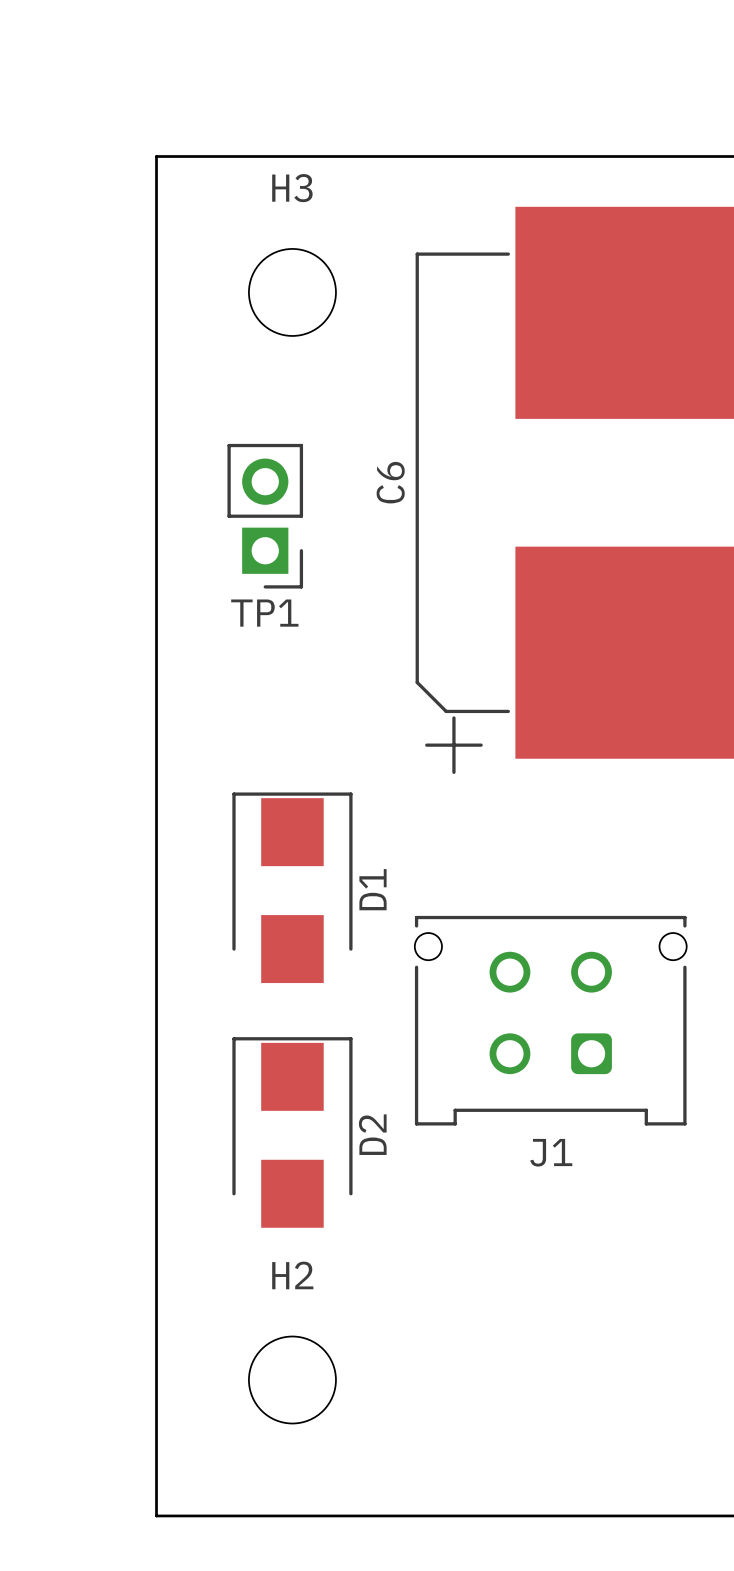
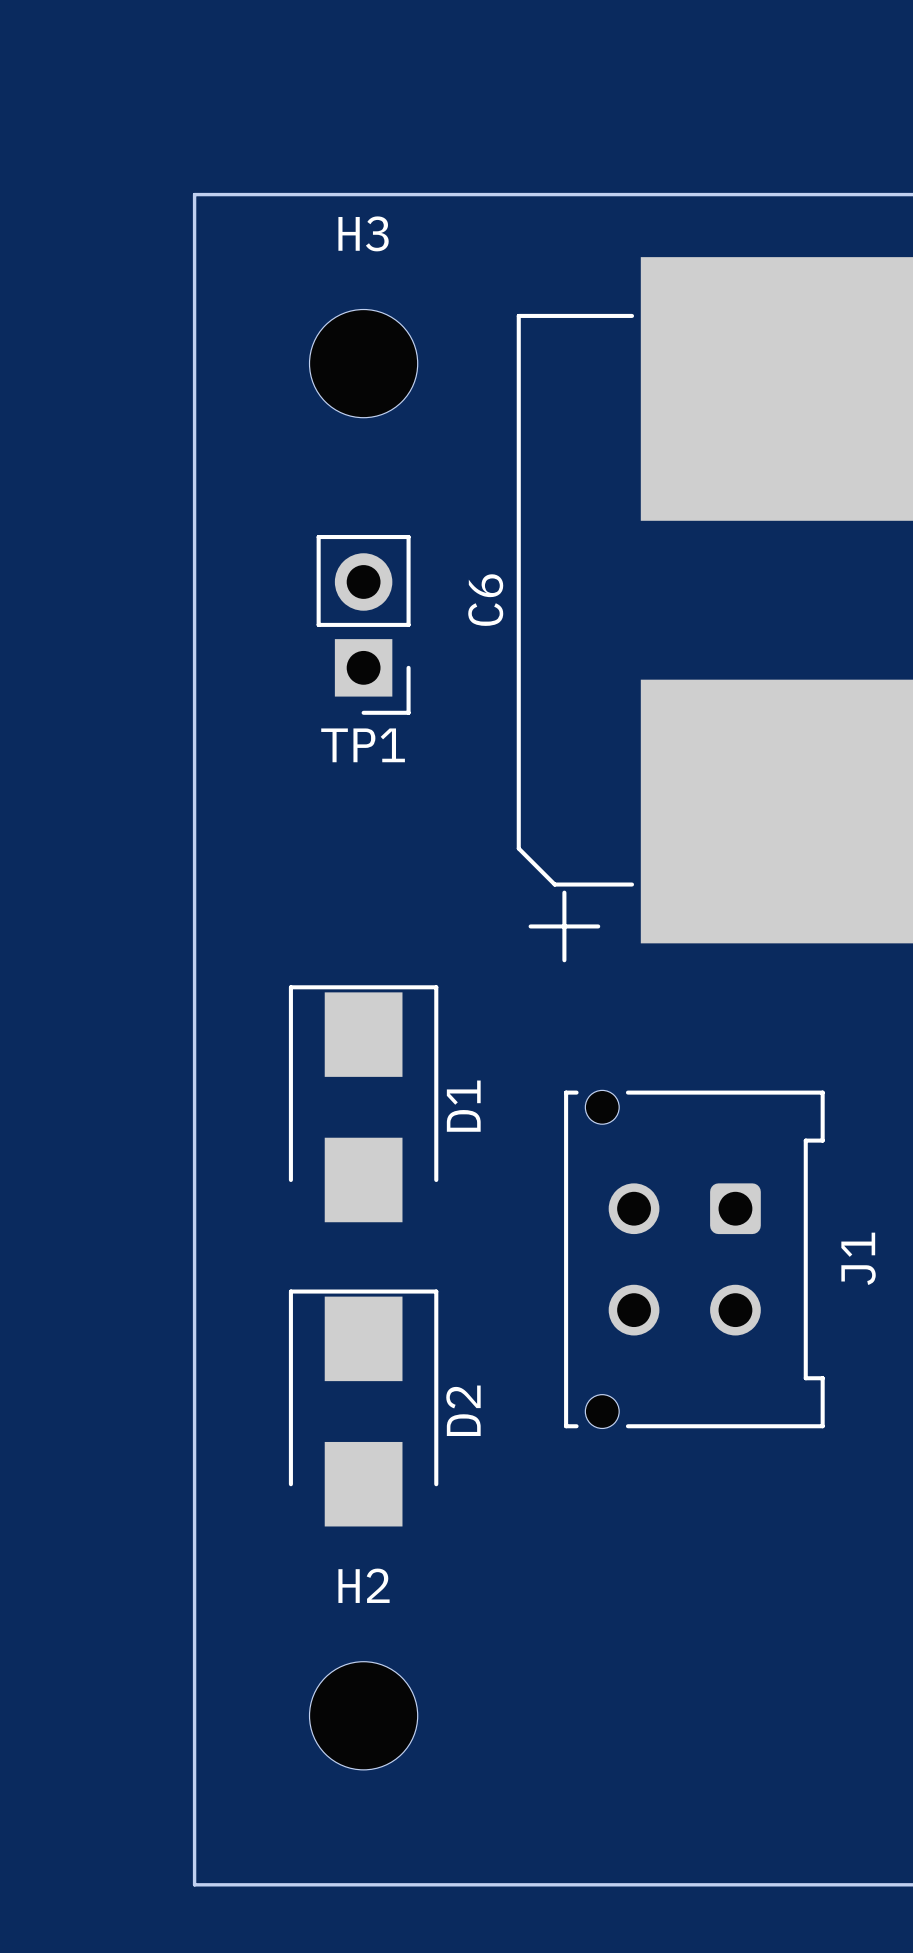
TP1 position: (265, 516) -> (363, 624)
J1 rotation: 0° (550, 1020) -> 90° counterclockwise (694, 1259)

